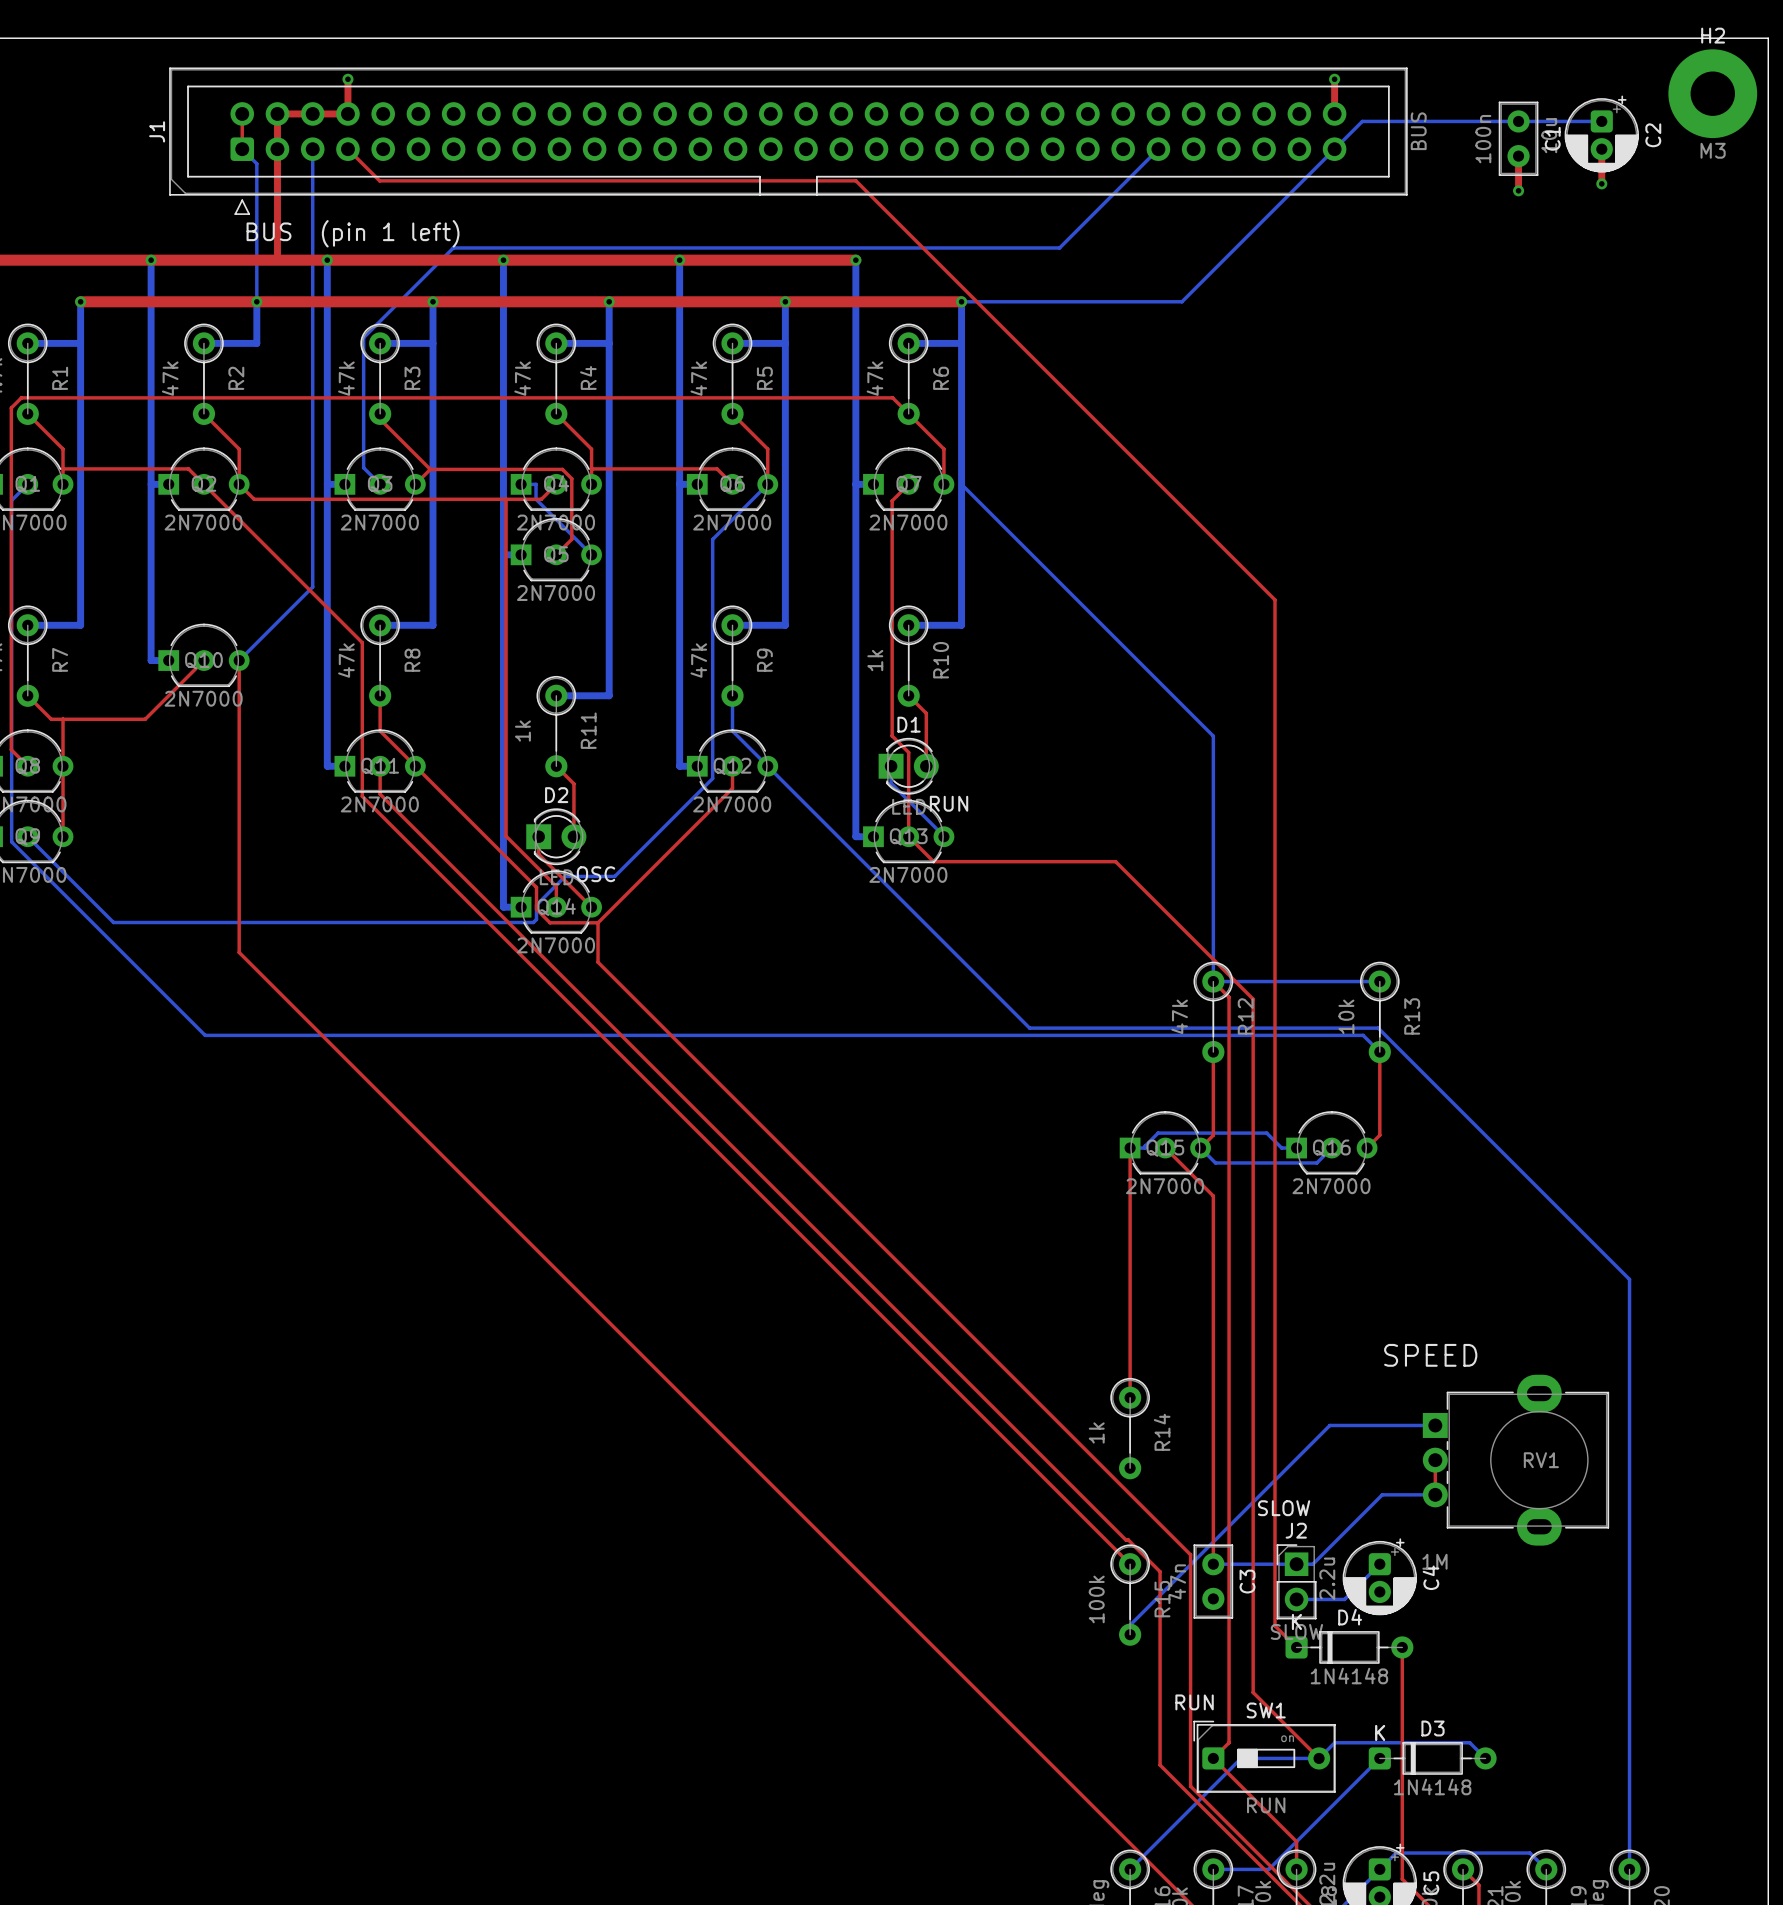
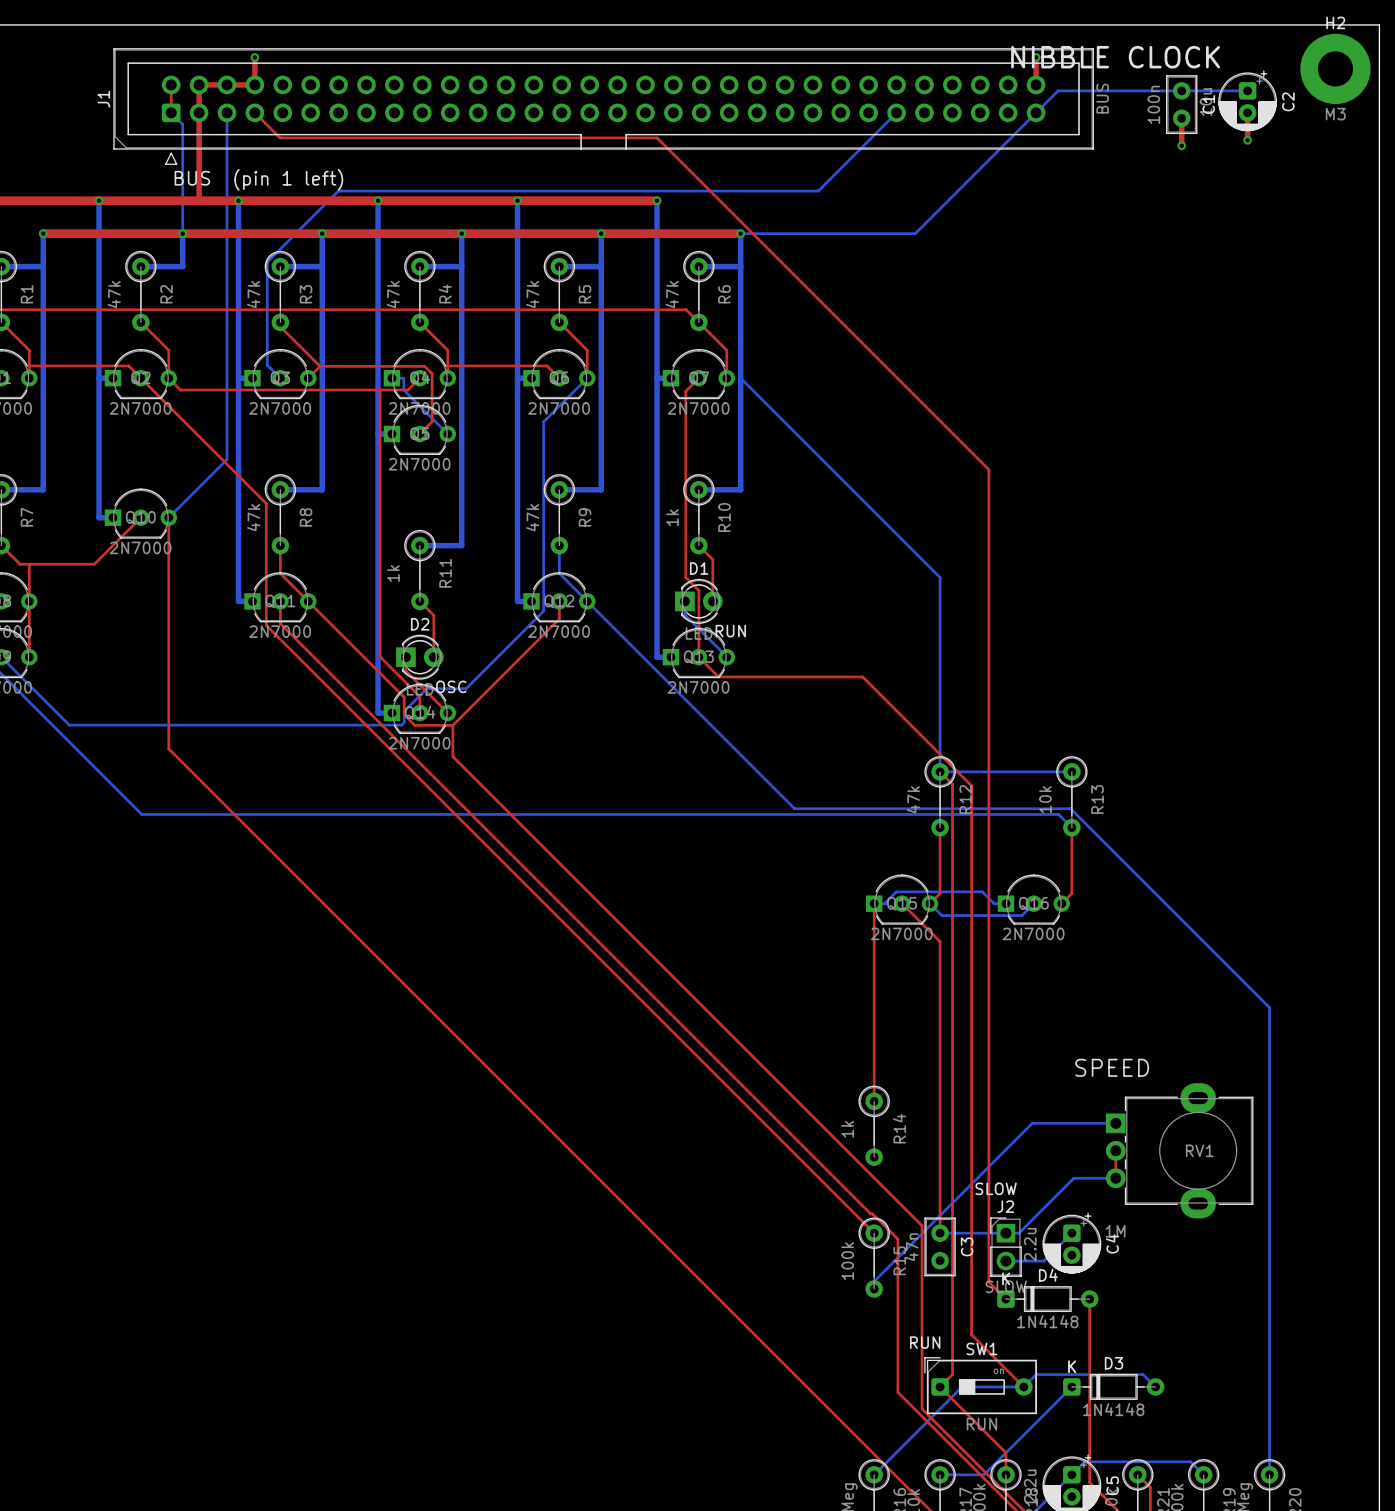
text: none -> NIBBLE CLOCK (1115, 57)

